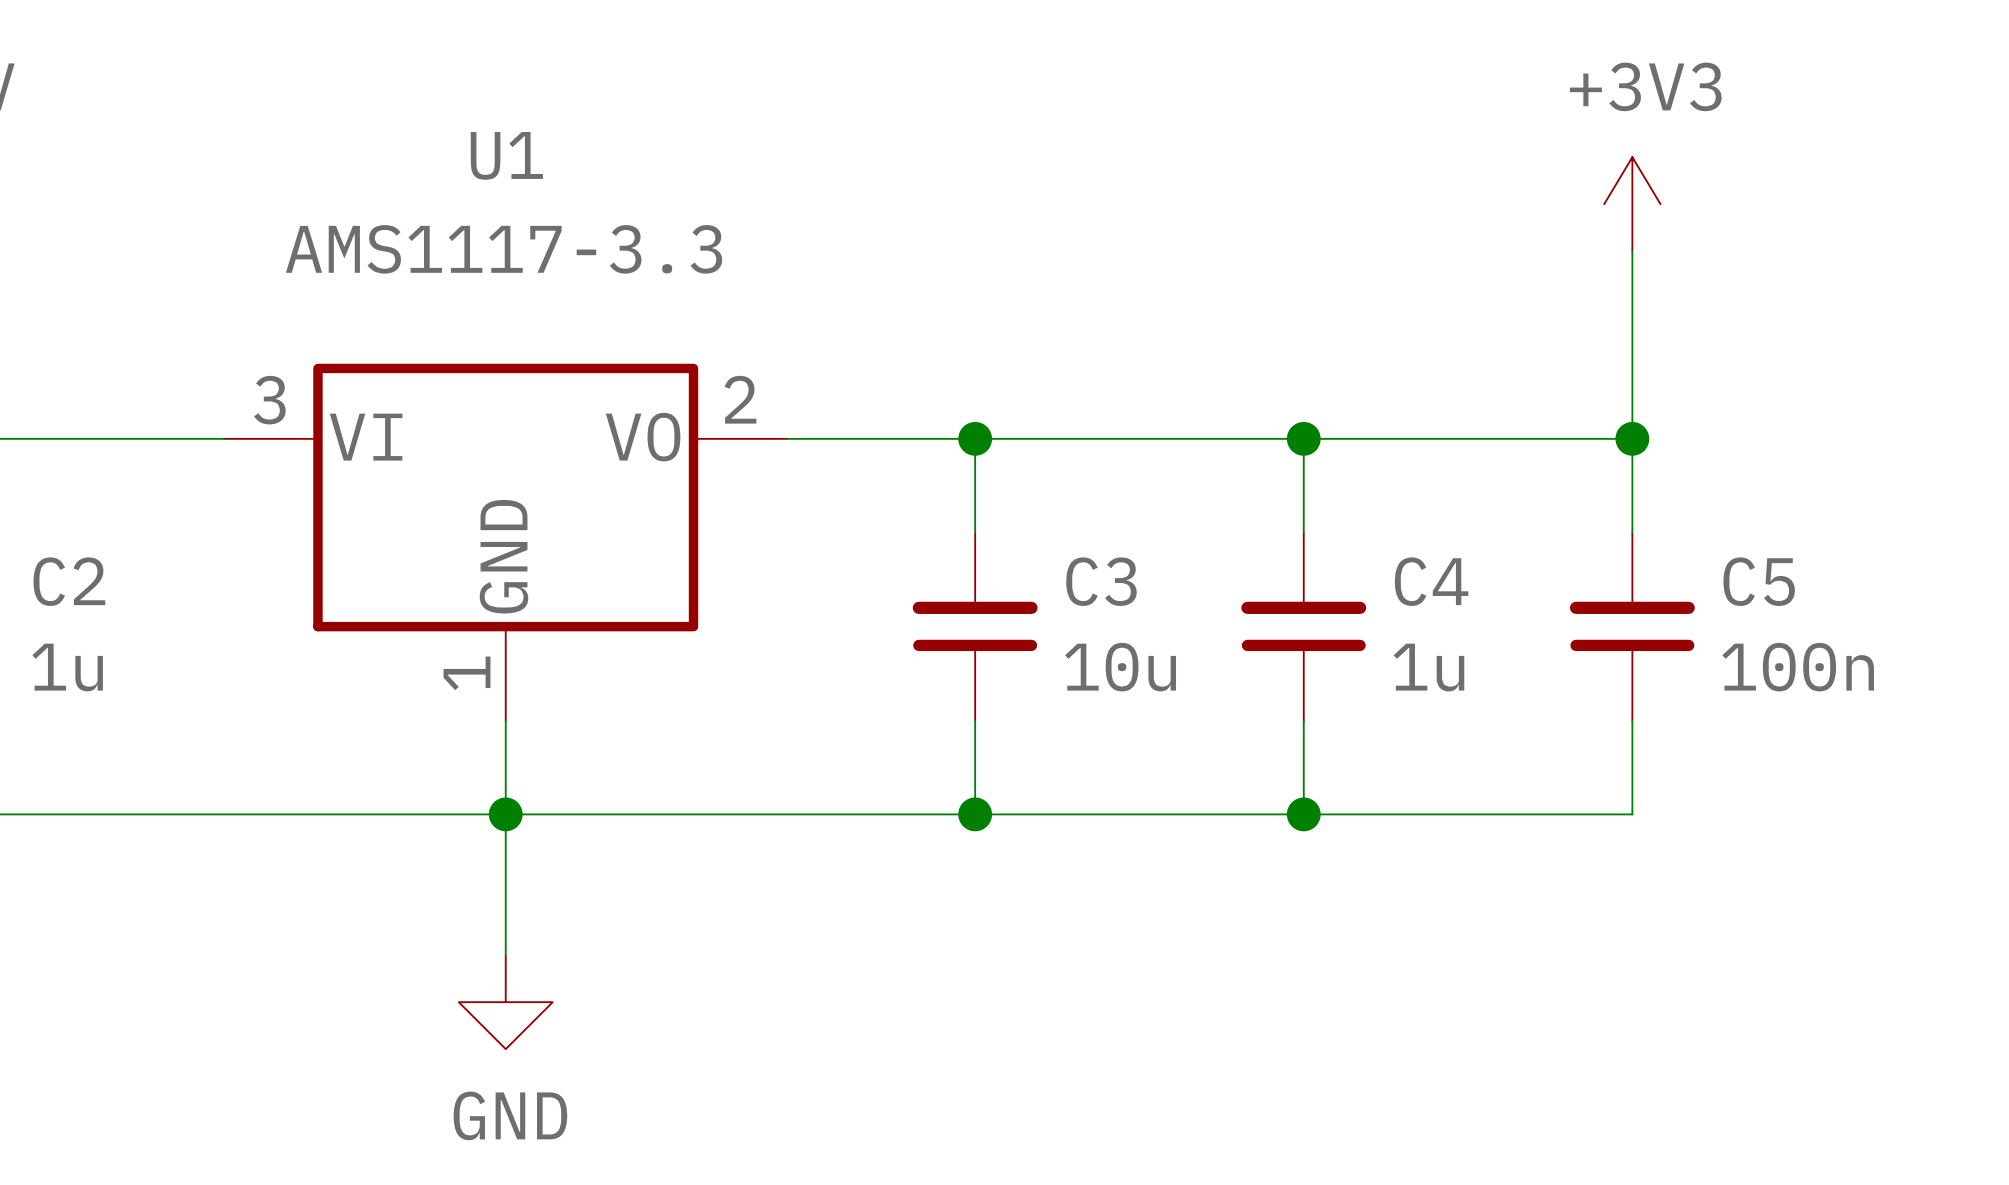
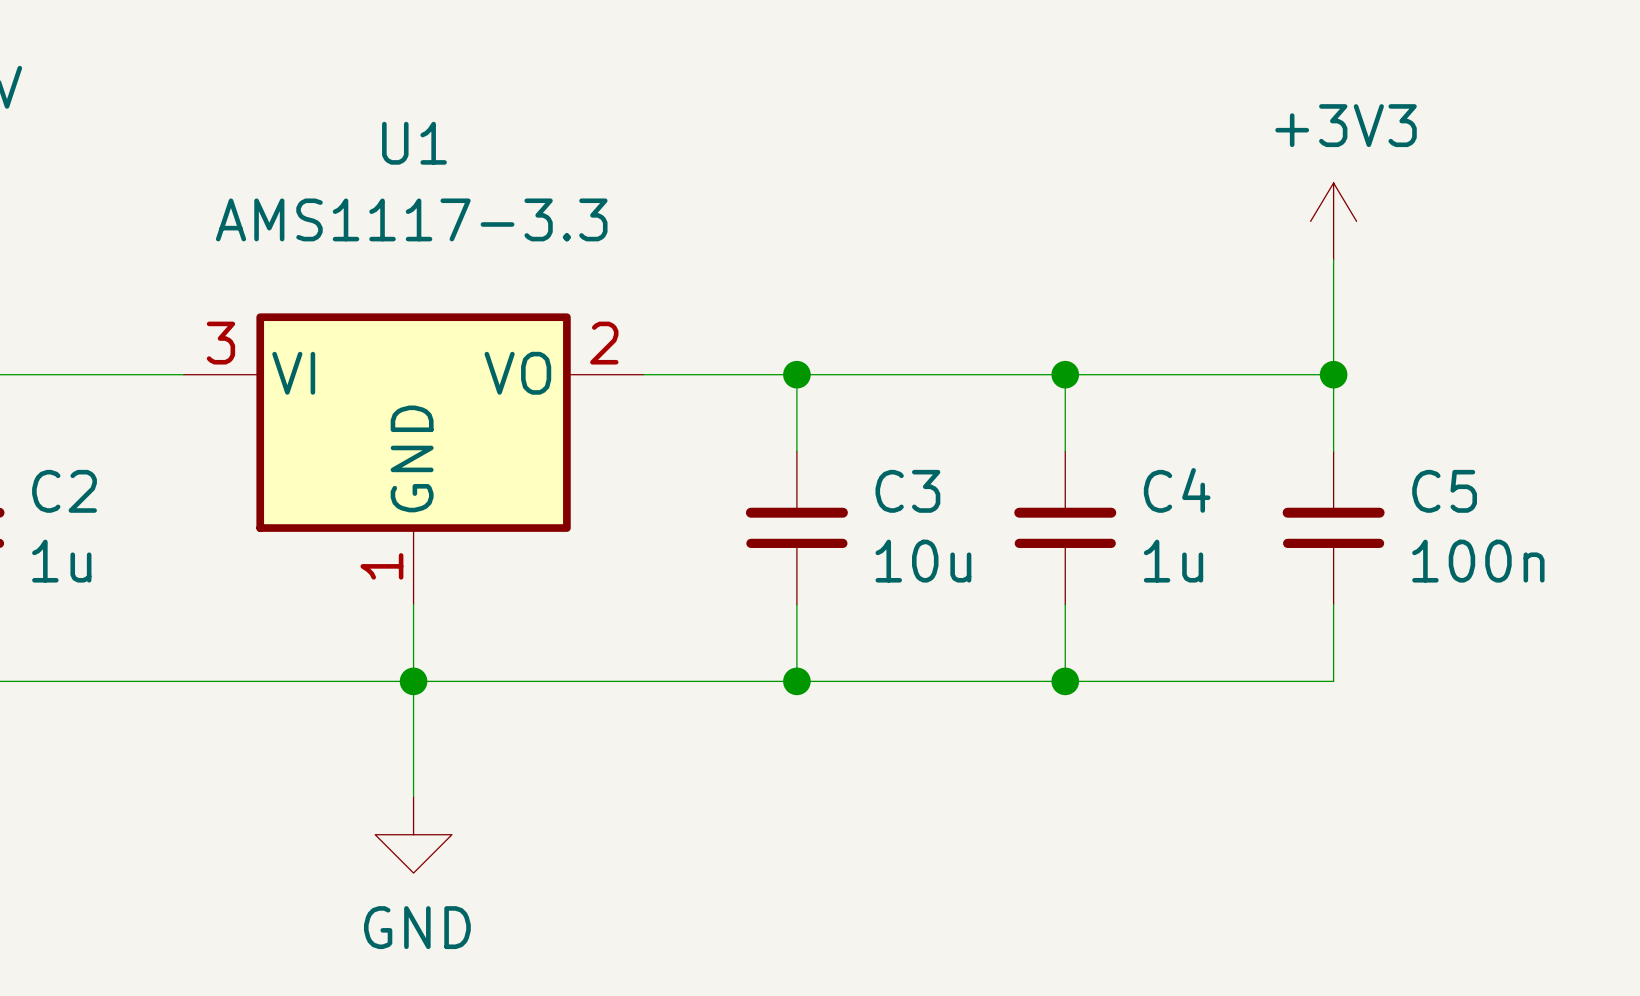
power symbol position: +3V3 (1632, 204) -> +3V3 (1333, 221)

